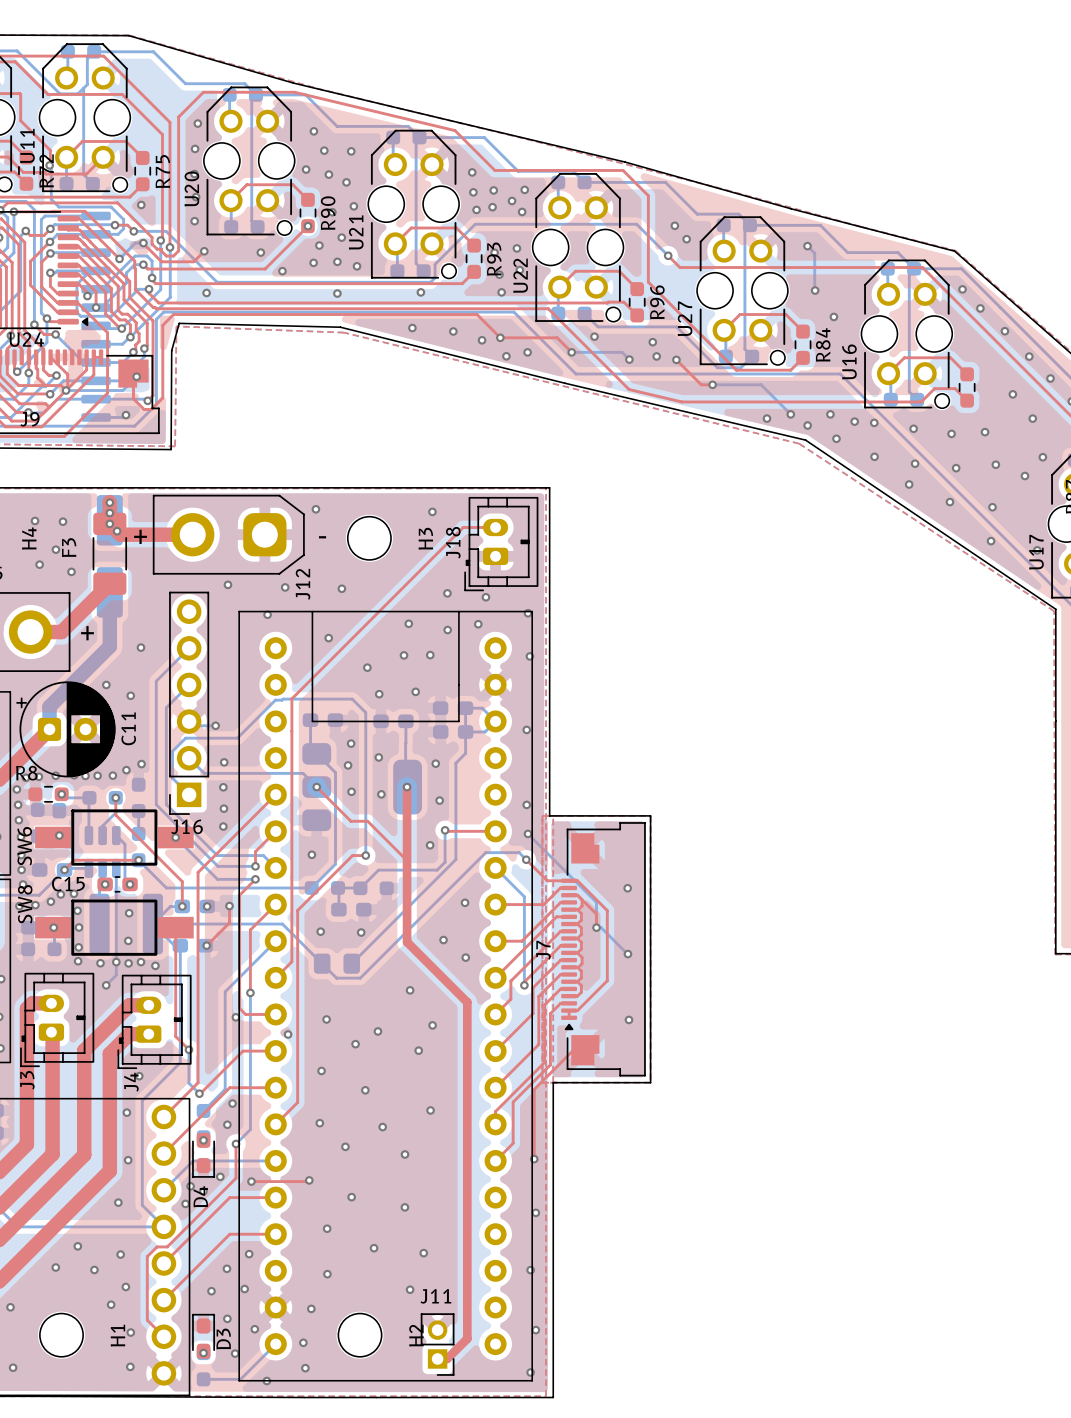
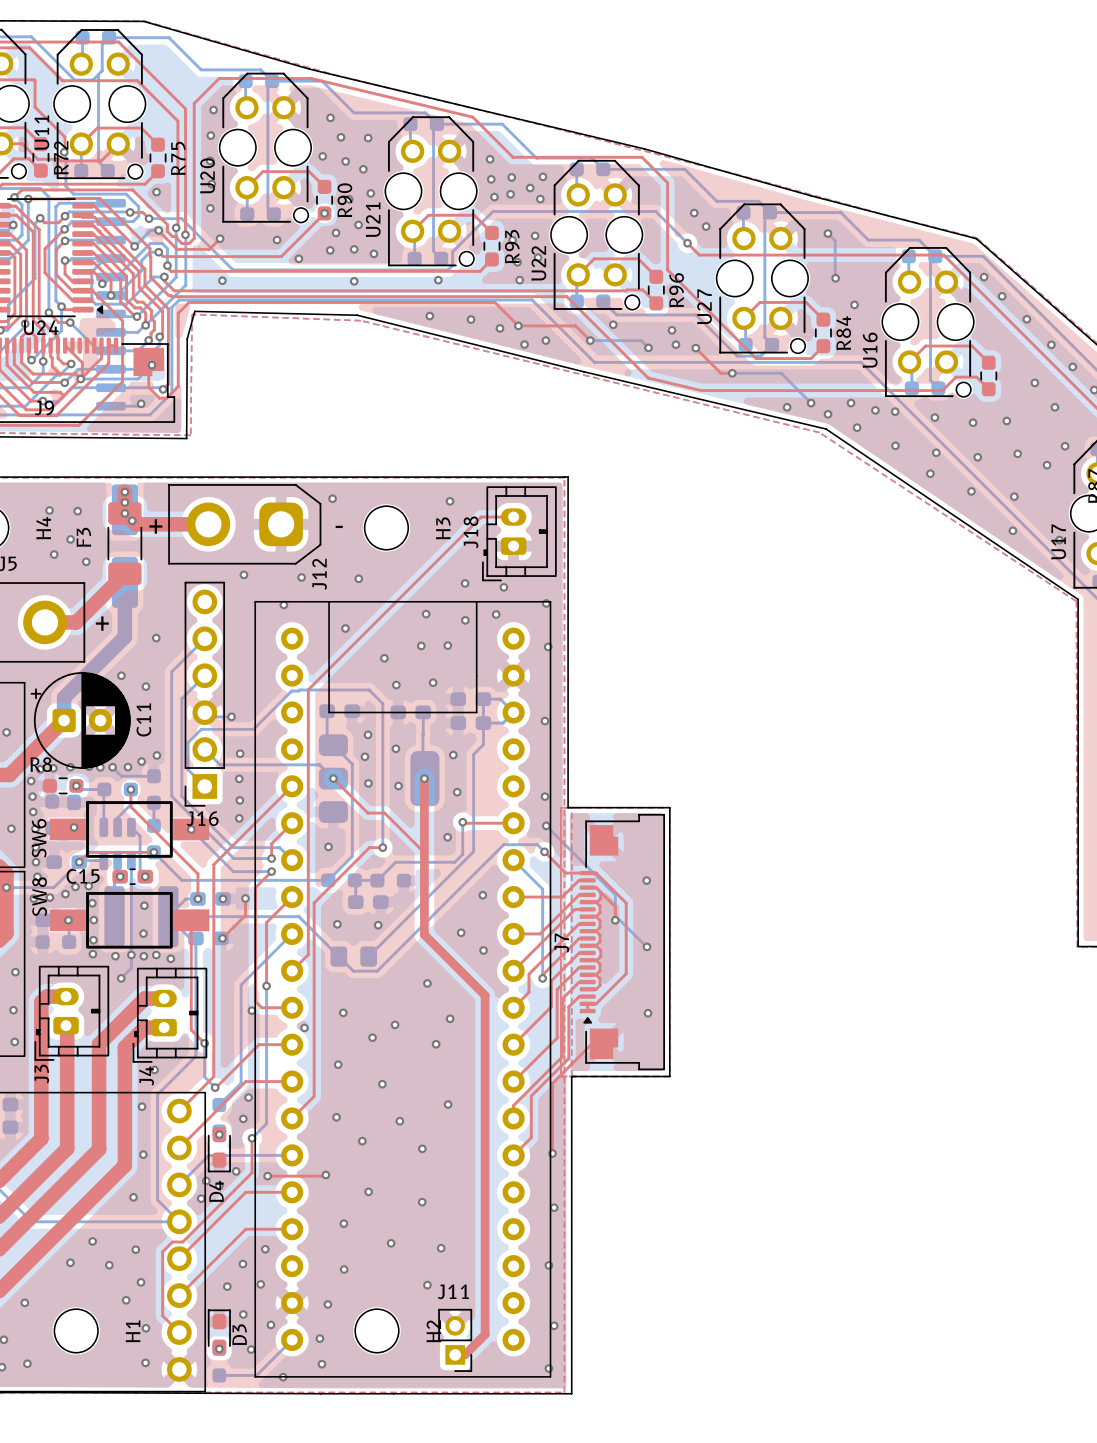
bottom track: none -> (112, 767) (121, 776) (153, 776)

